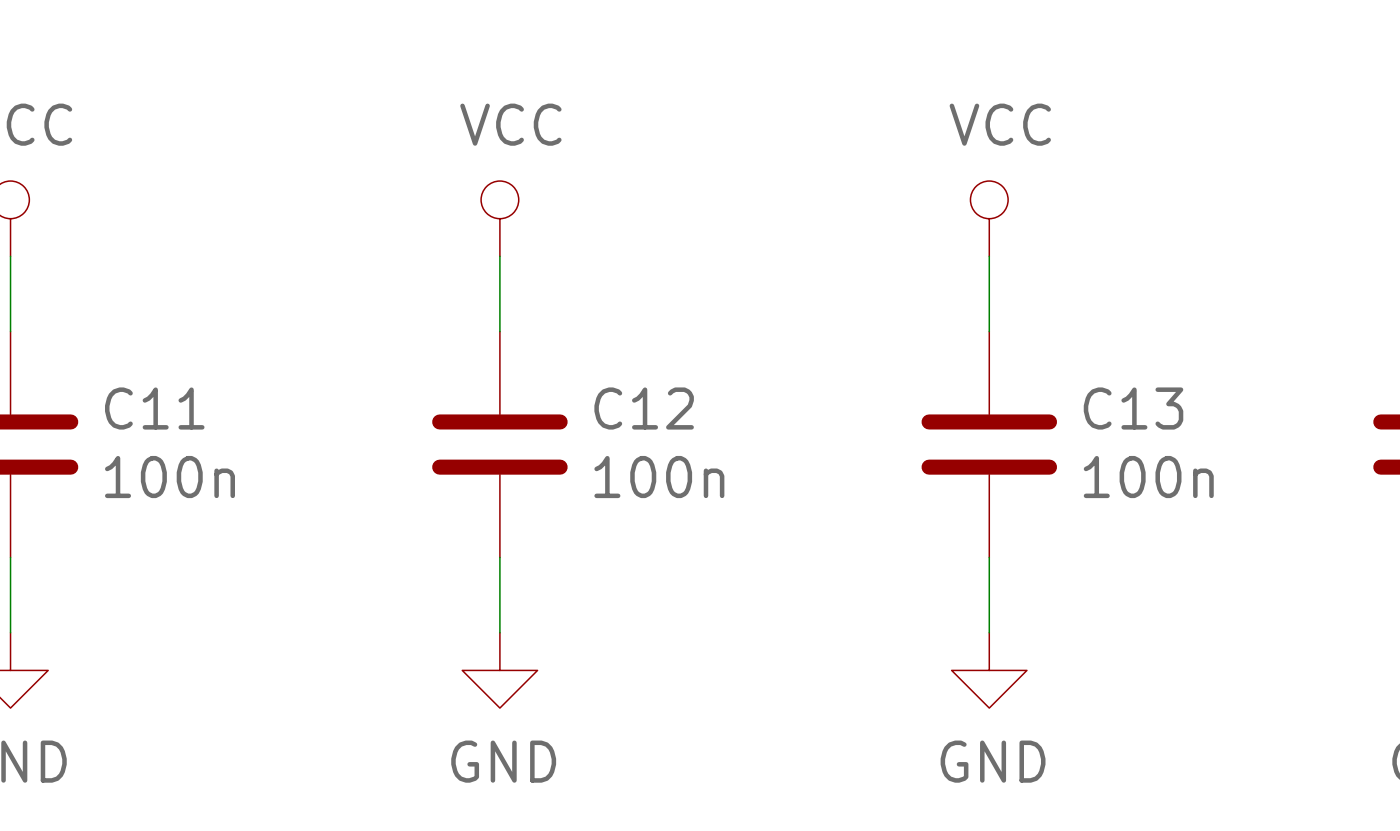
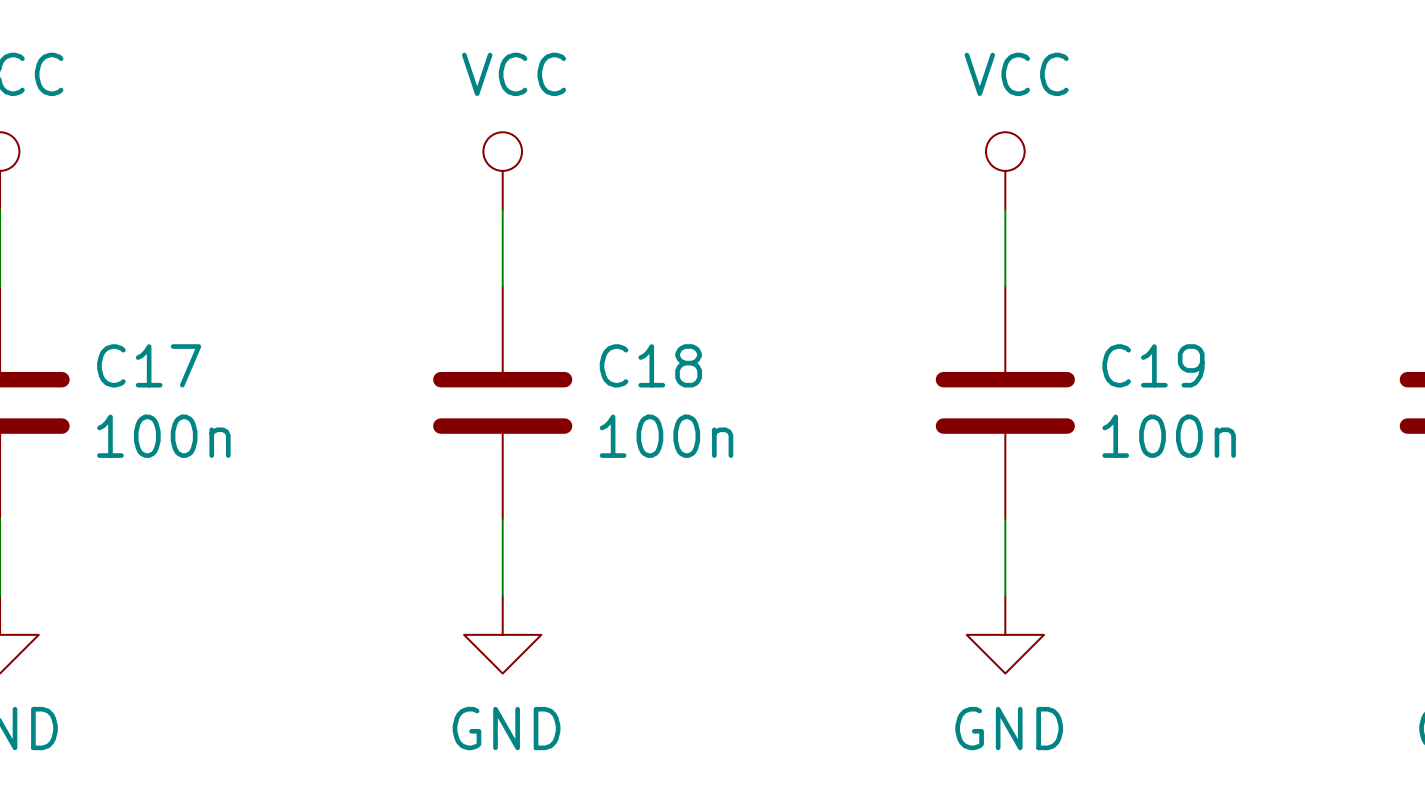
C11 name: C11 (154, 408) -> C17 (149, 365)
C12 name: C12 (644, 408) -> C18 (650, 365)
C13 name: C13 (1133, 408) -> C19 (1153, 365)

